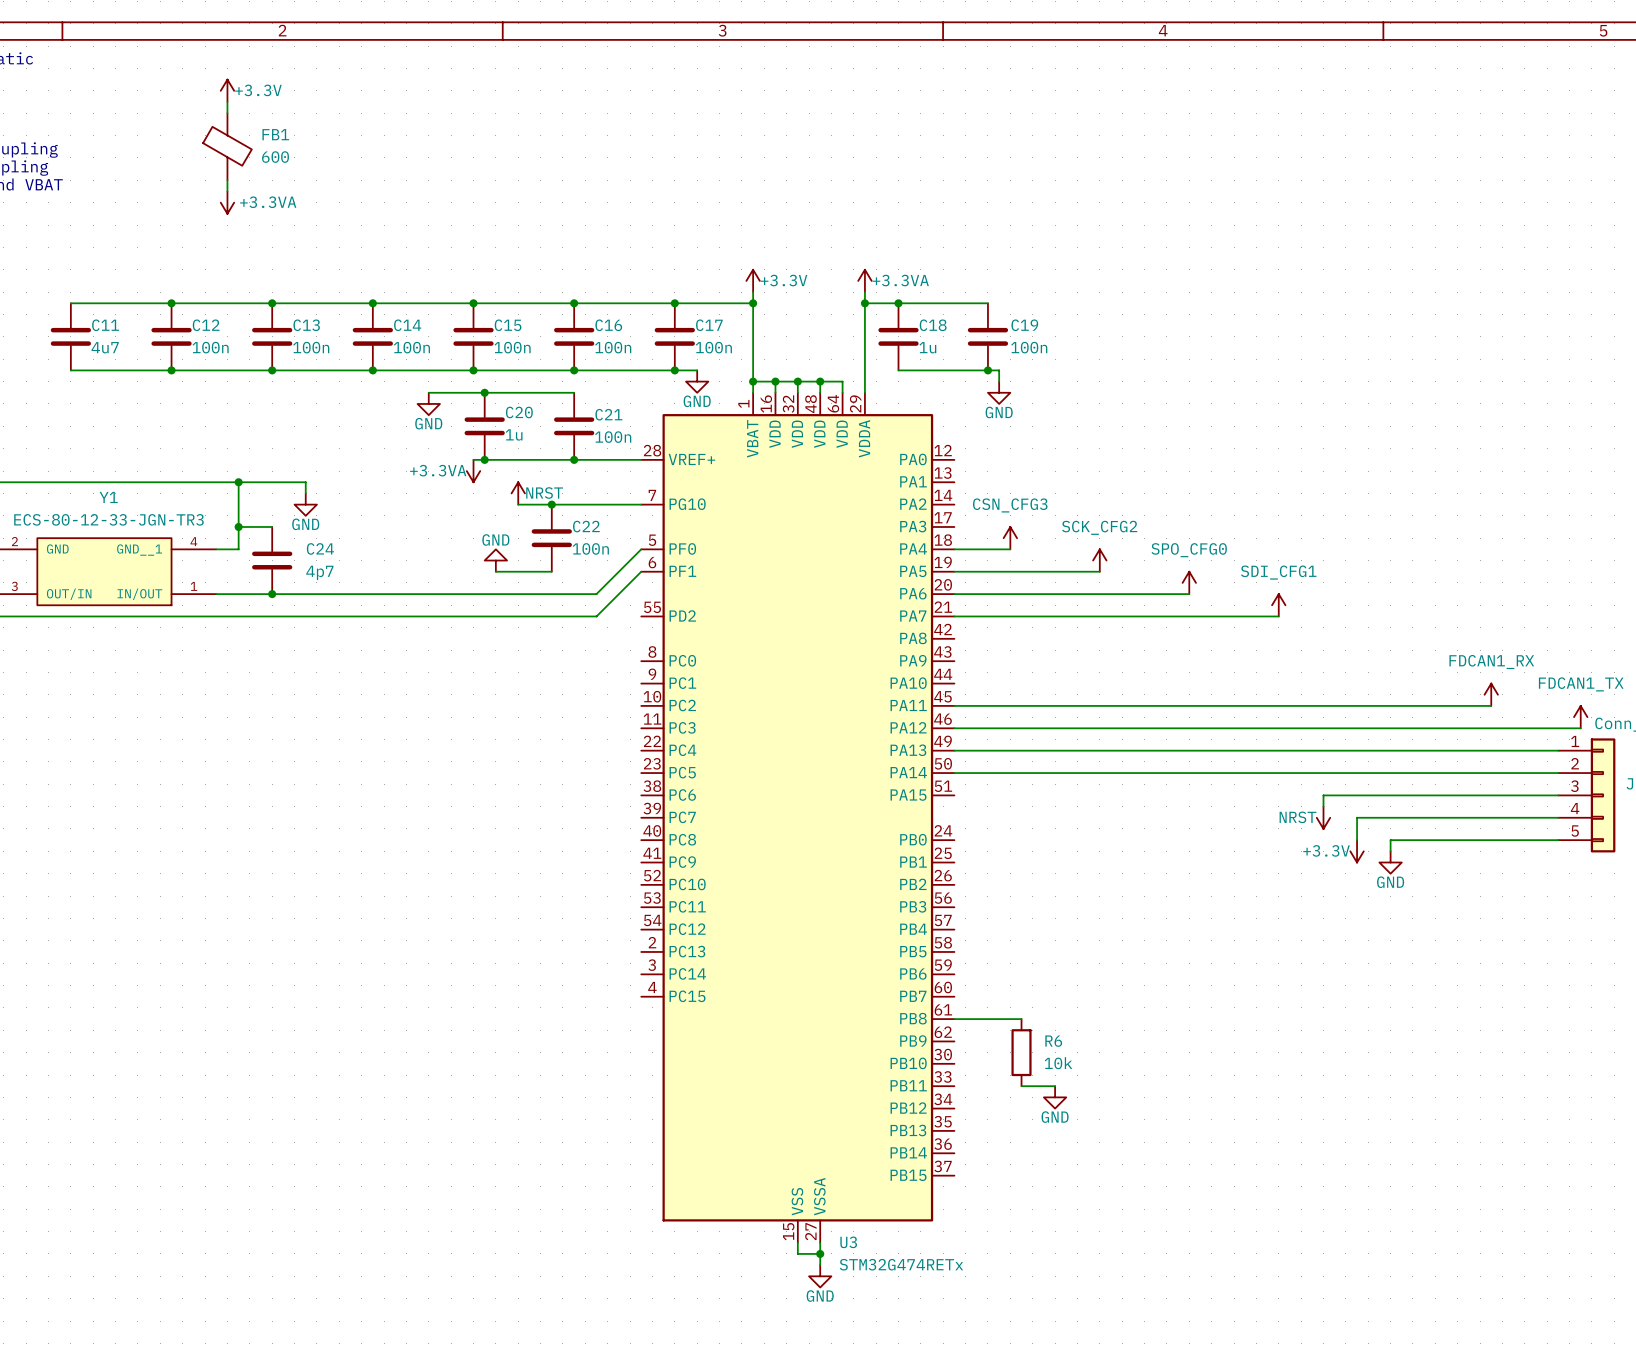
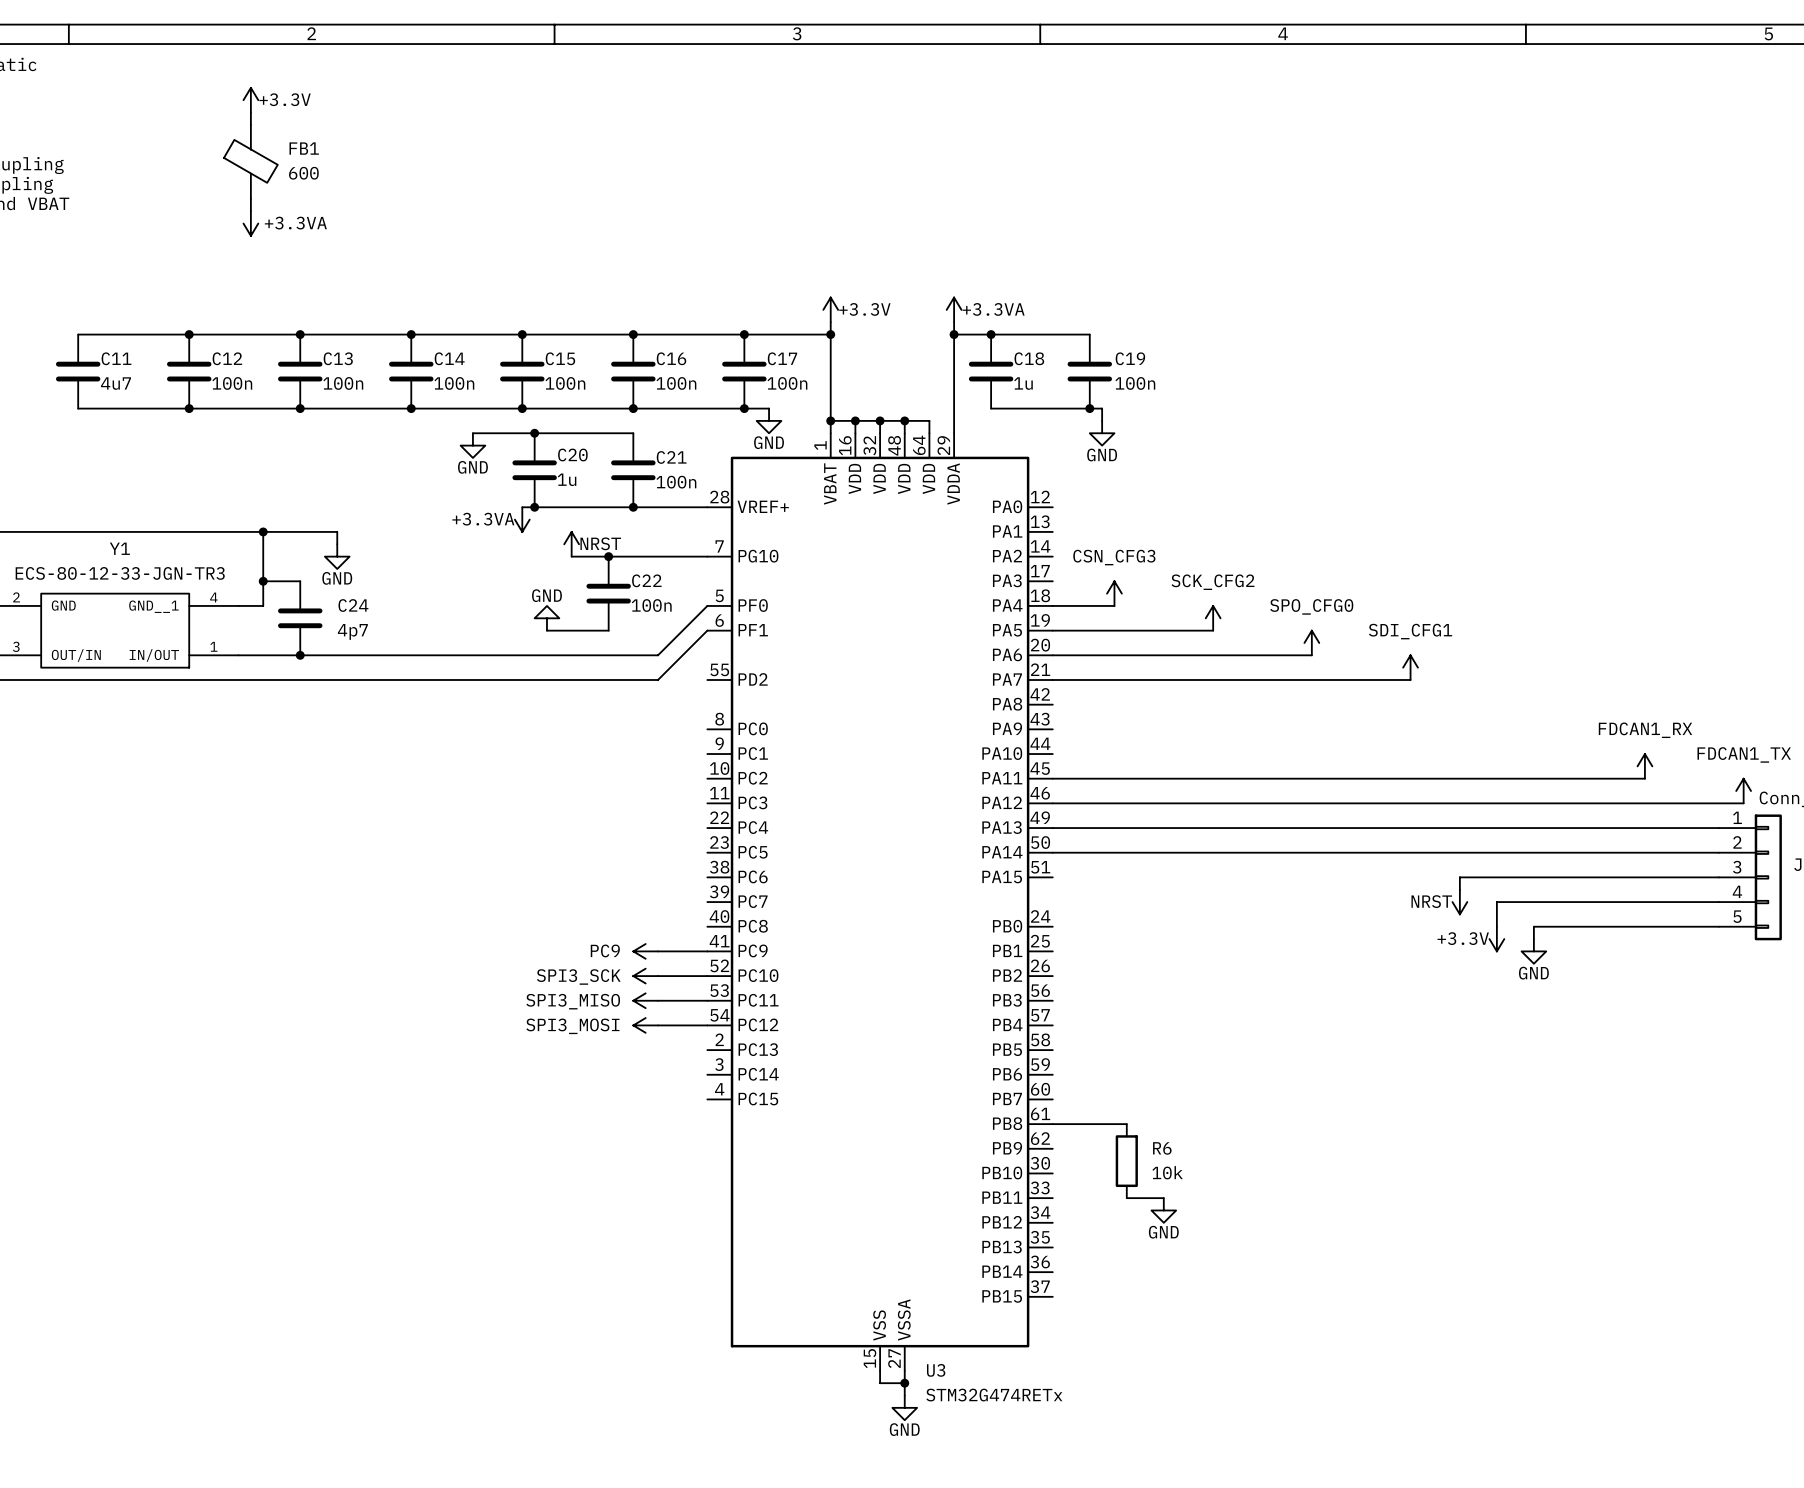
power symbol: none -> PC9 (645, 951)
wire: none -> (658, 951) (707, 951)
power symbol: none -> SPI3_SCK (645, 976)
wire: none -> (658, 976) (707, 976)
power symbol: none -> SPI3_MISO (645, 1000)
wire: none -> (658, 1000) (707, 1000)
power symbol: none -> SPI3_MOSI (645, 1025)
wire: none -> (658, 1025) (707, 1025)

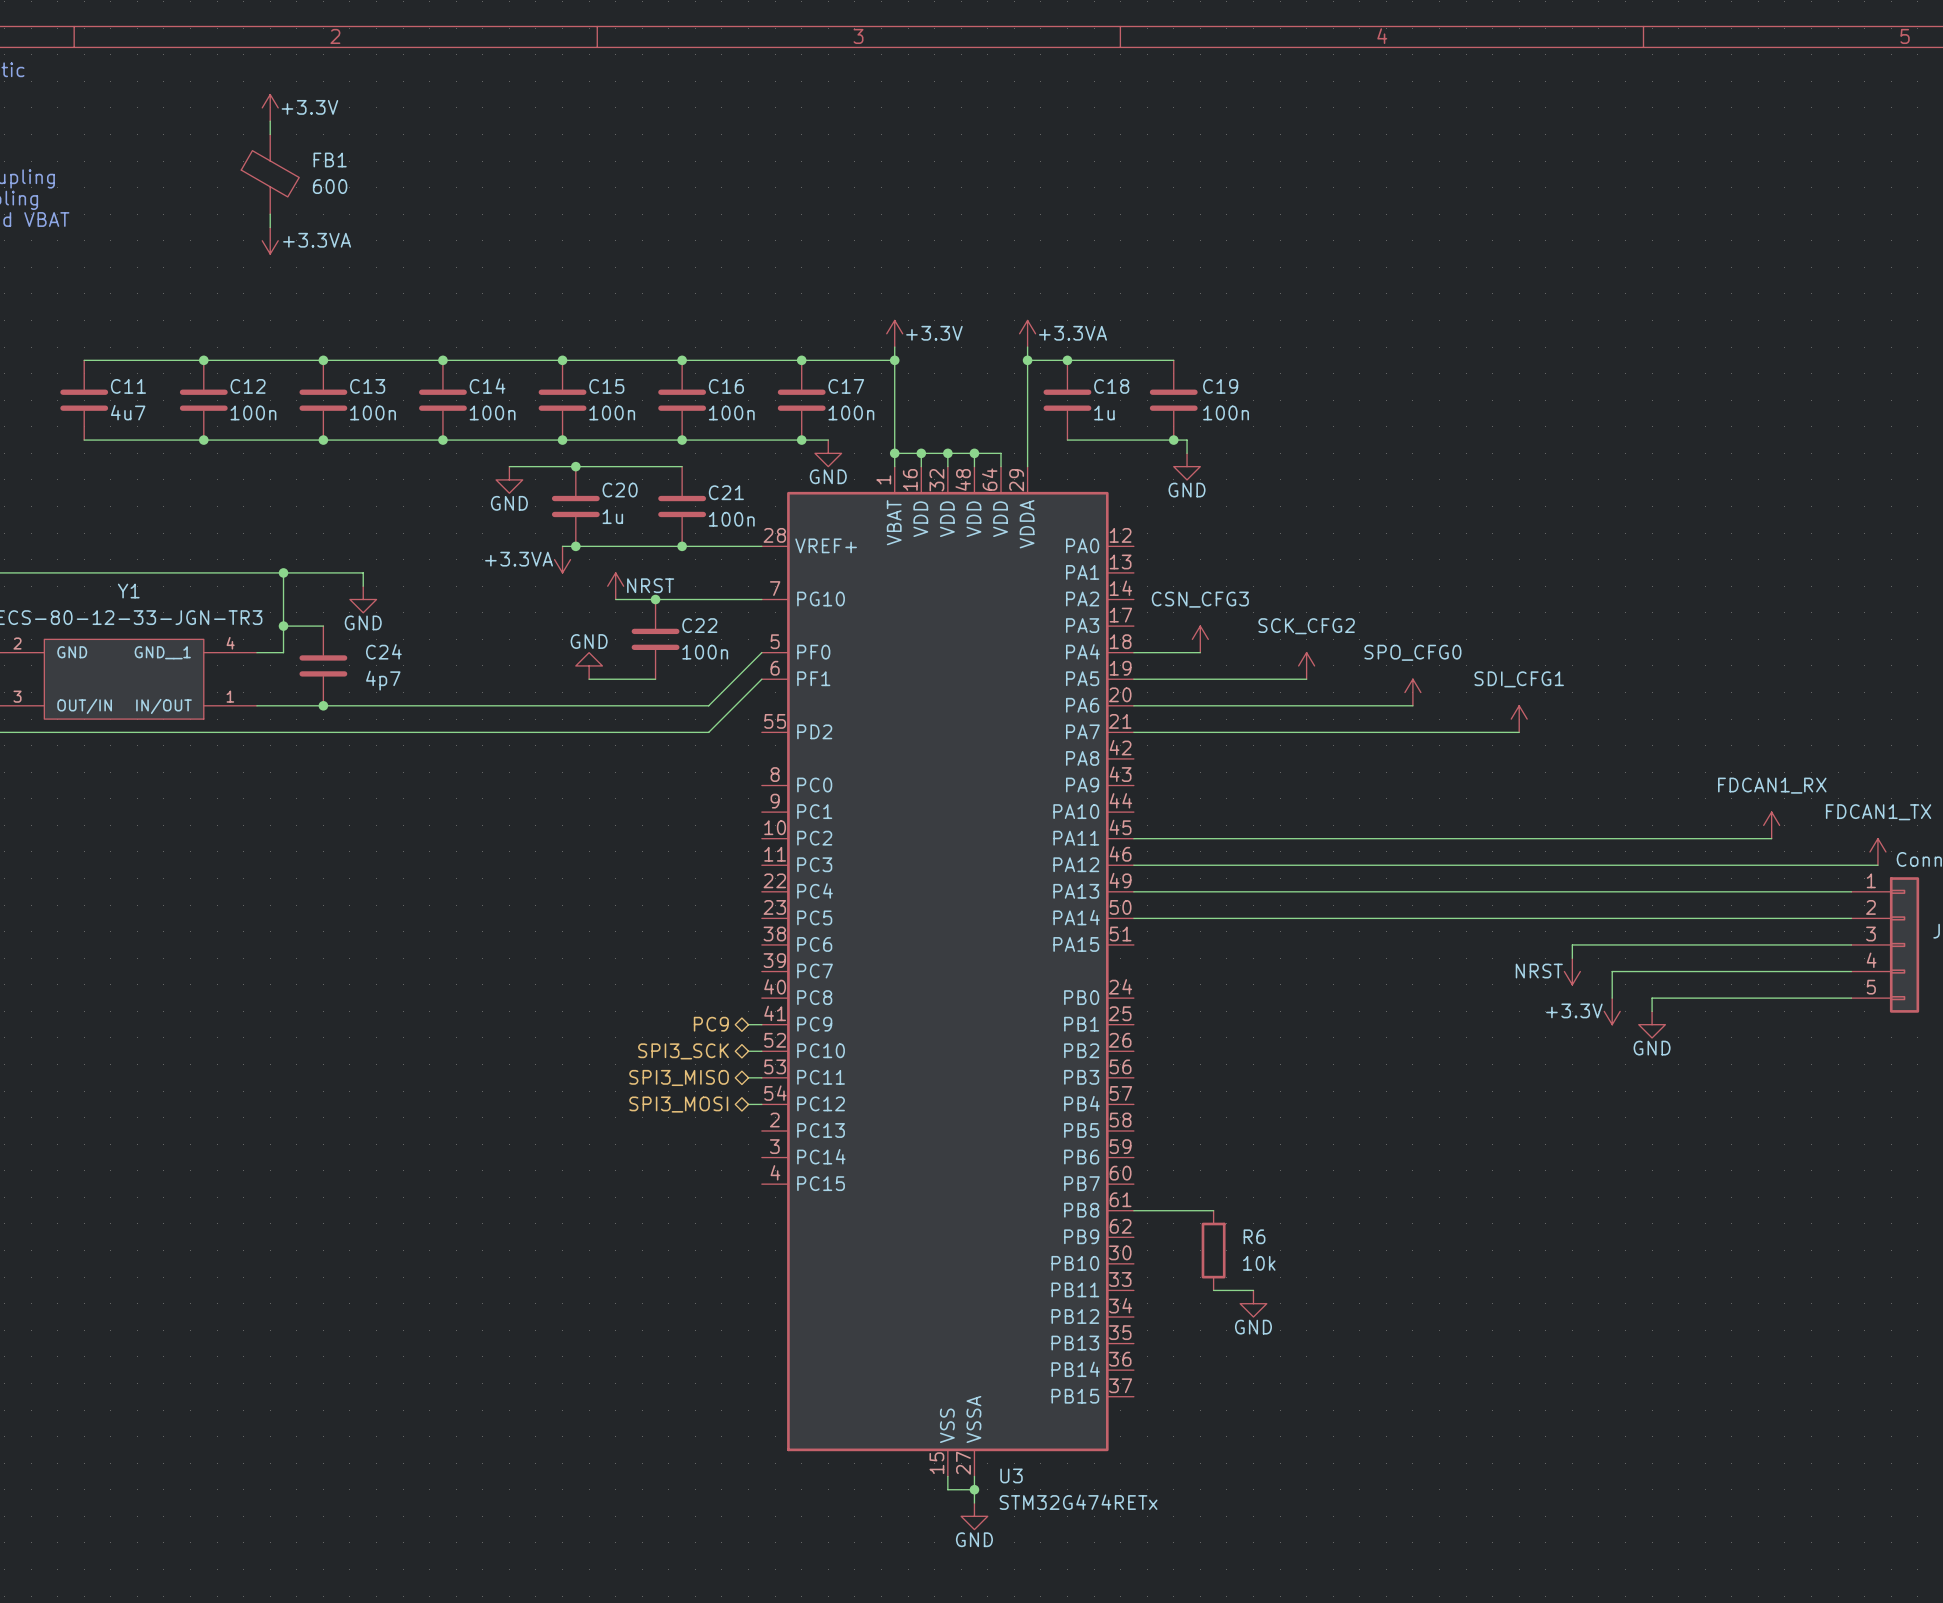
hierarchical label: none -> PC9 (711, 1024)
power symbol: PC9 (645, 951) -> none
wire: (658, 951) (695, 951) -> none
power symbol: SPI3_SCK (645, 976) -> none
wire: (658, 976) (695, 976) -> none
hierarchical label: none -> SPI3_SCK (683, 1051)
power symbol: SPI3_MISO (645, 1000) -> none
wire: (658, 1000) (695, 1000) -> none
hierarchical label: none -> SPI3_MISO (679, 1077)
power symbol: SPI3_MOSI (645, 1025) -> none
wire: (658, 1025) (695, 1025) -> none
hierarchical label: none -> SPI3_MOSI (678, 1104)

